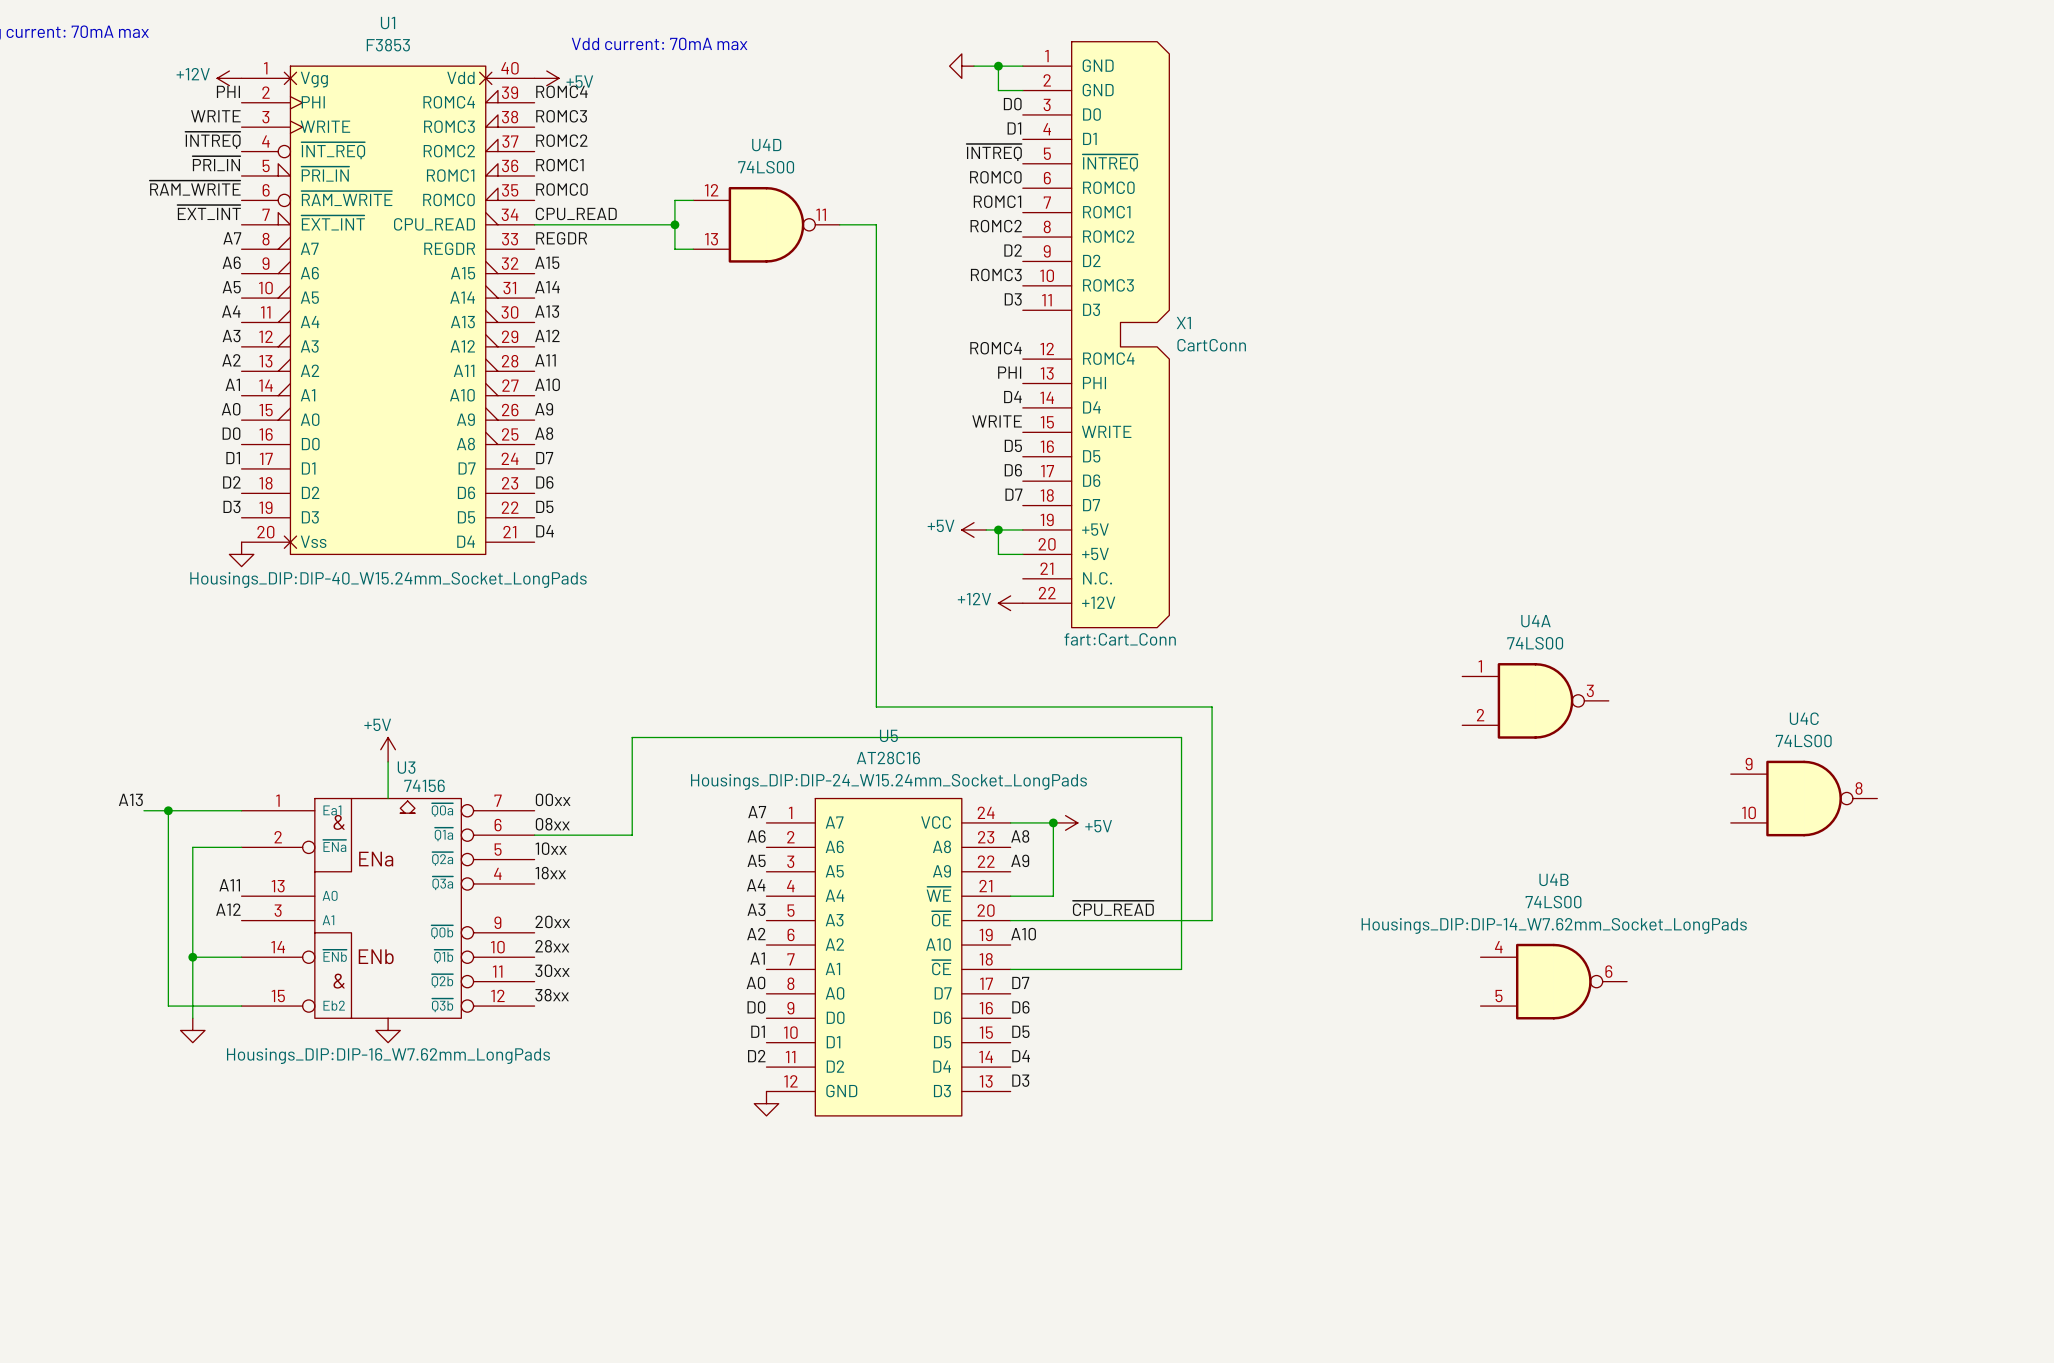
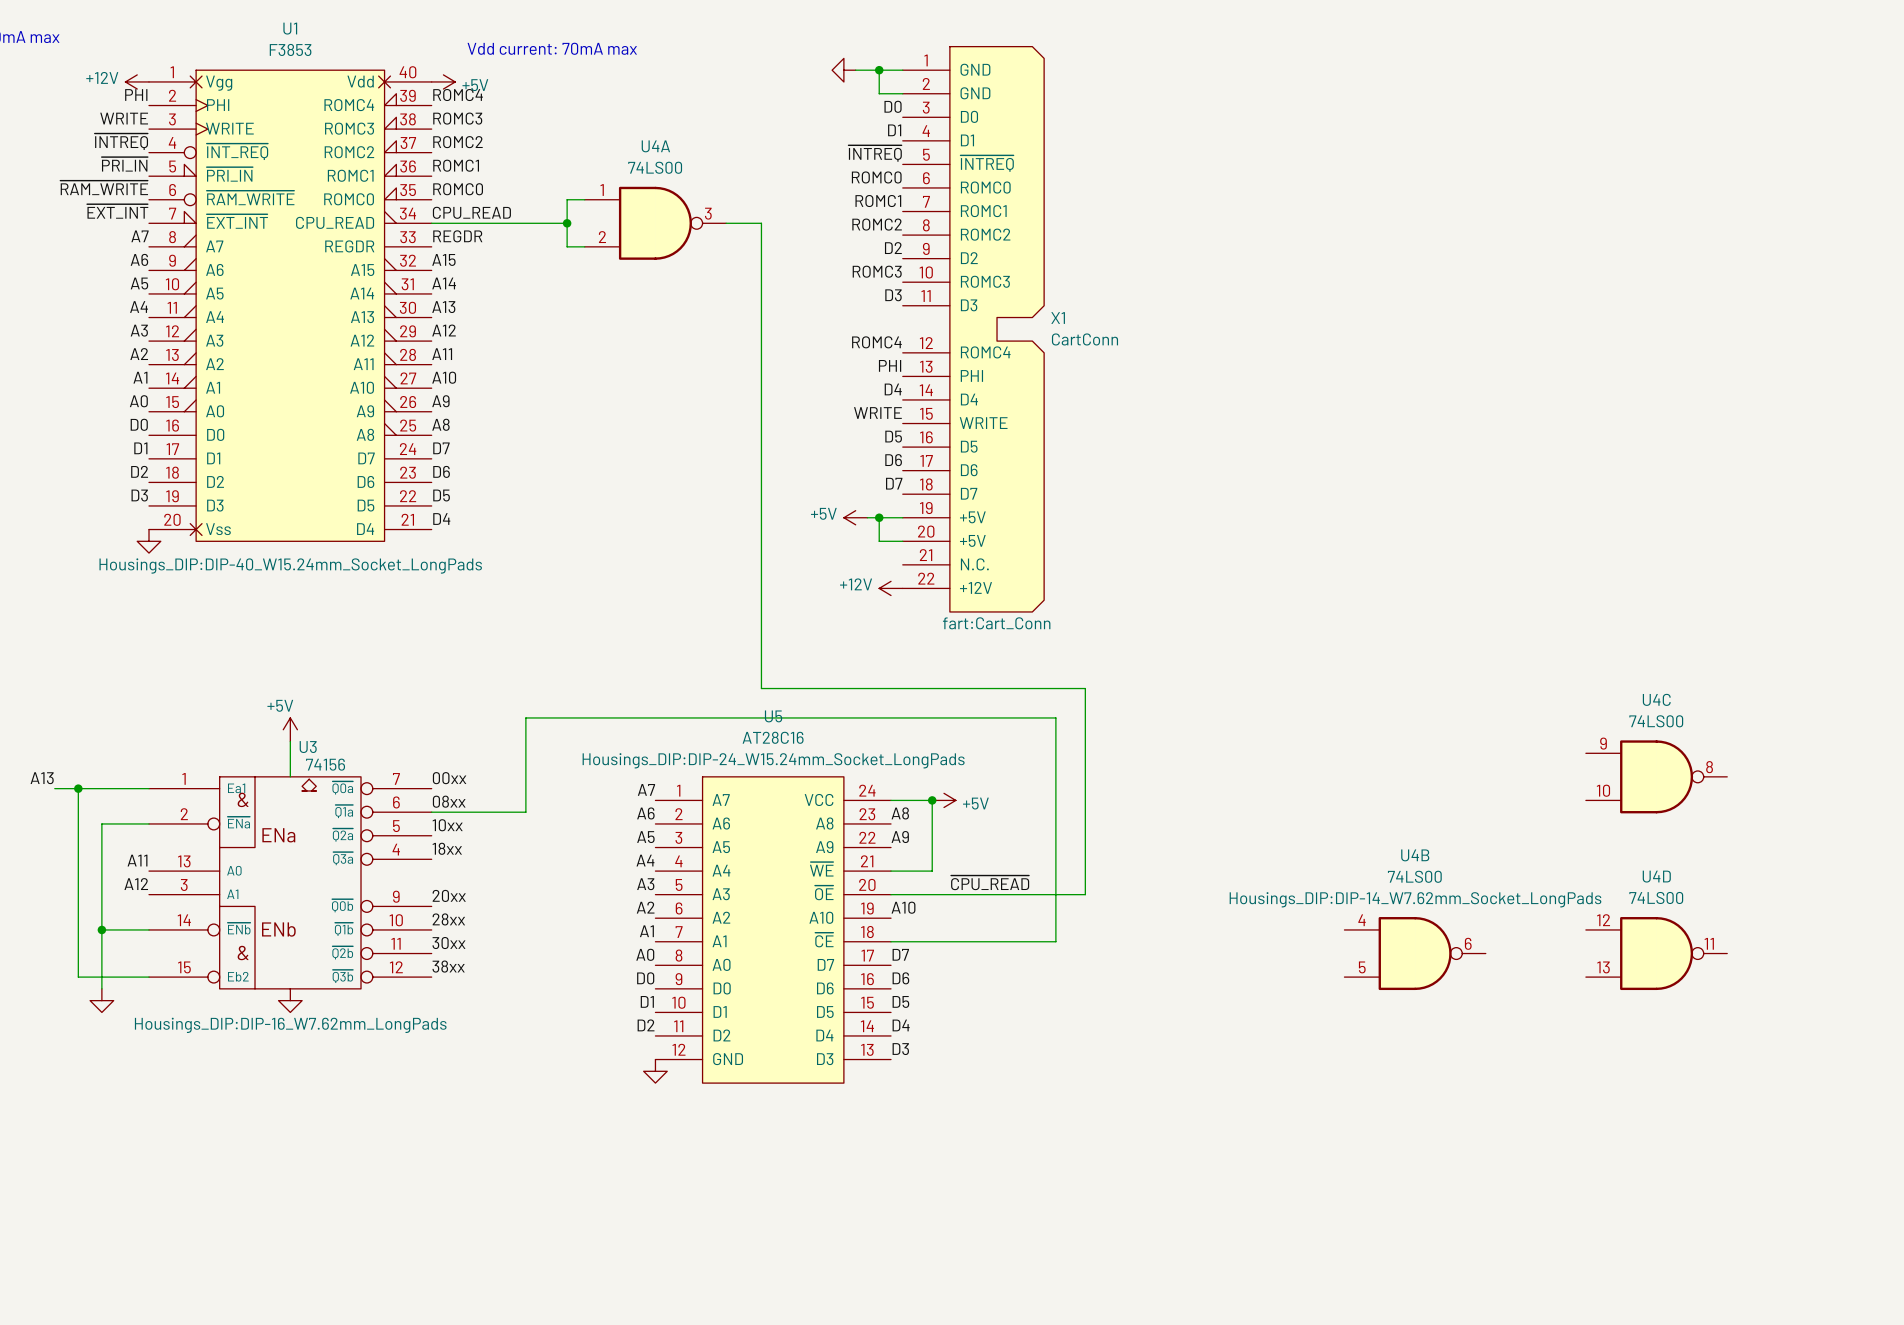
U4D position: (766, 224) -> (1656, 953)
U4A position: (1535, 700) -> (655, 223)

